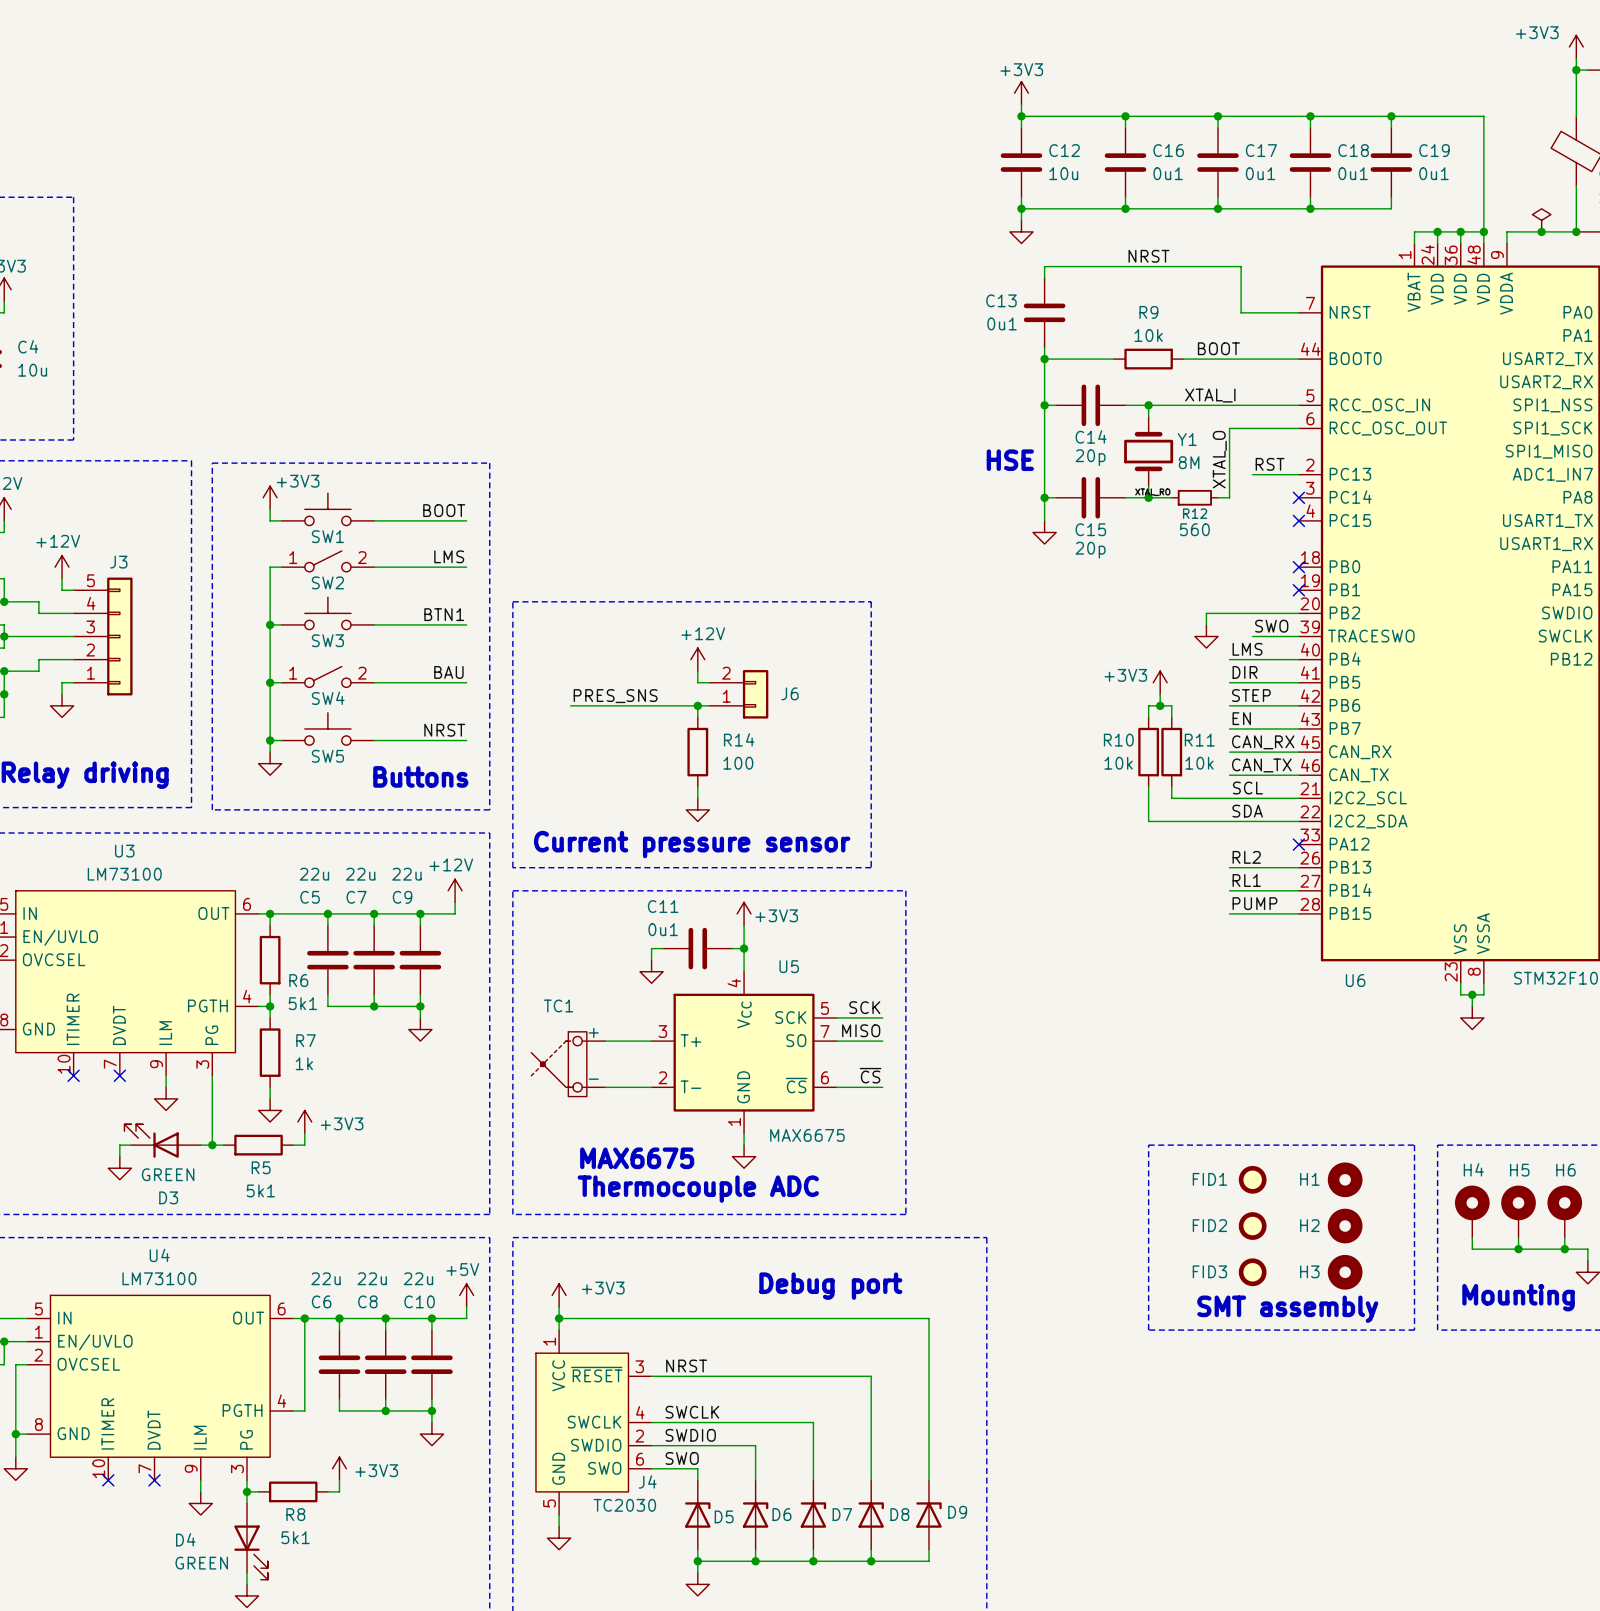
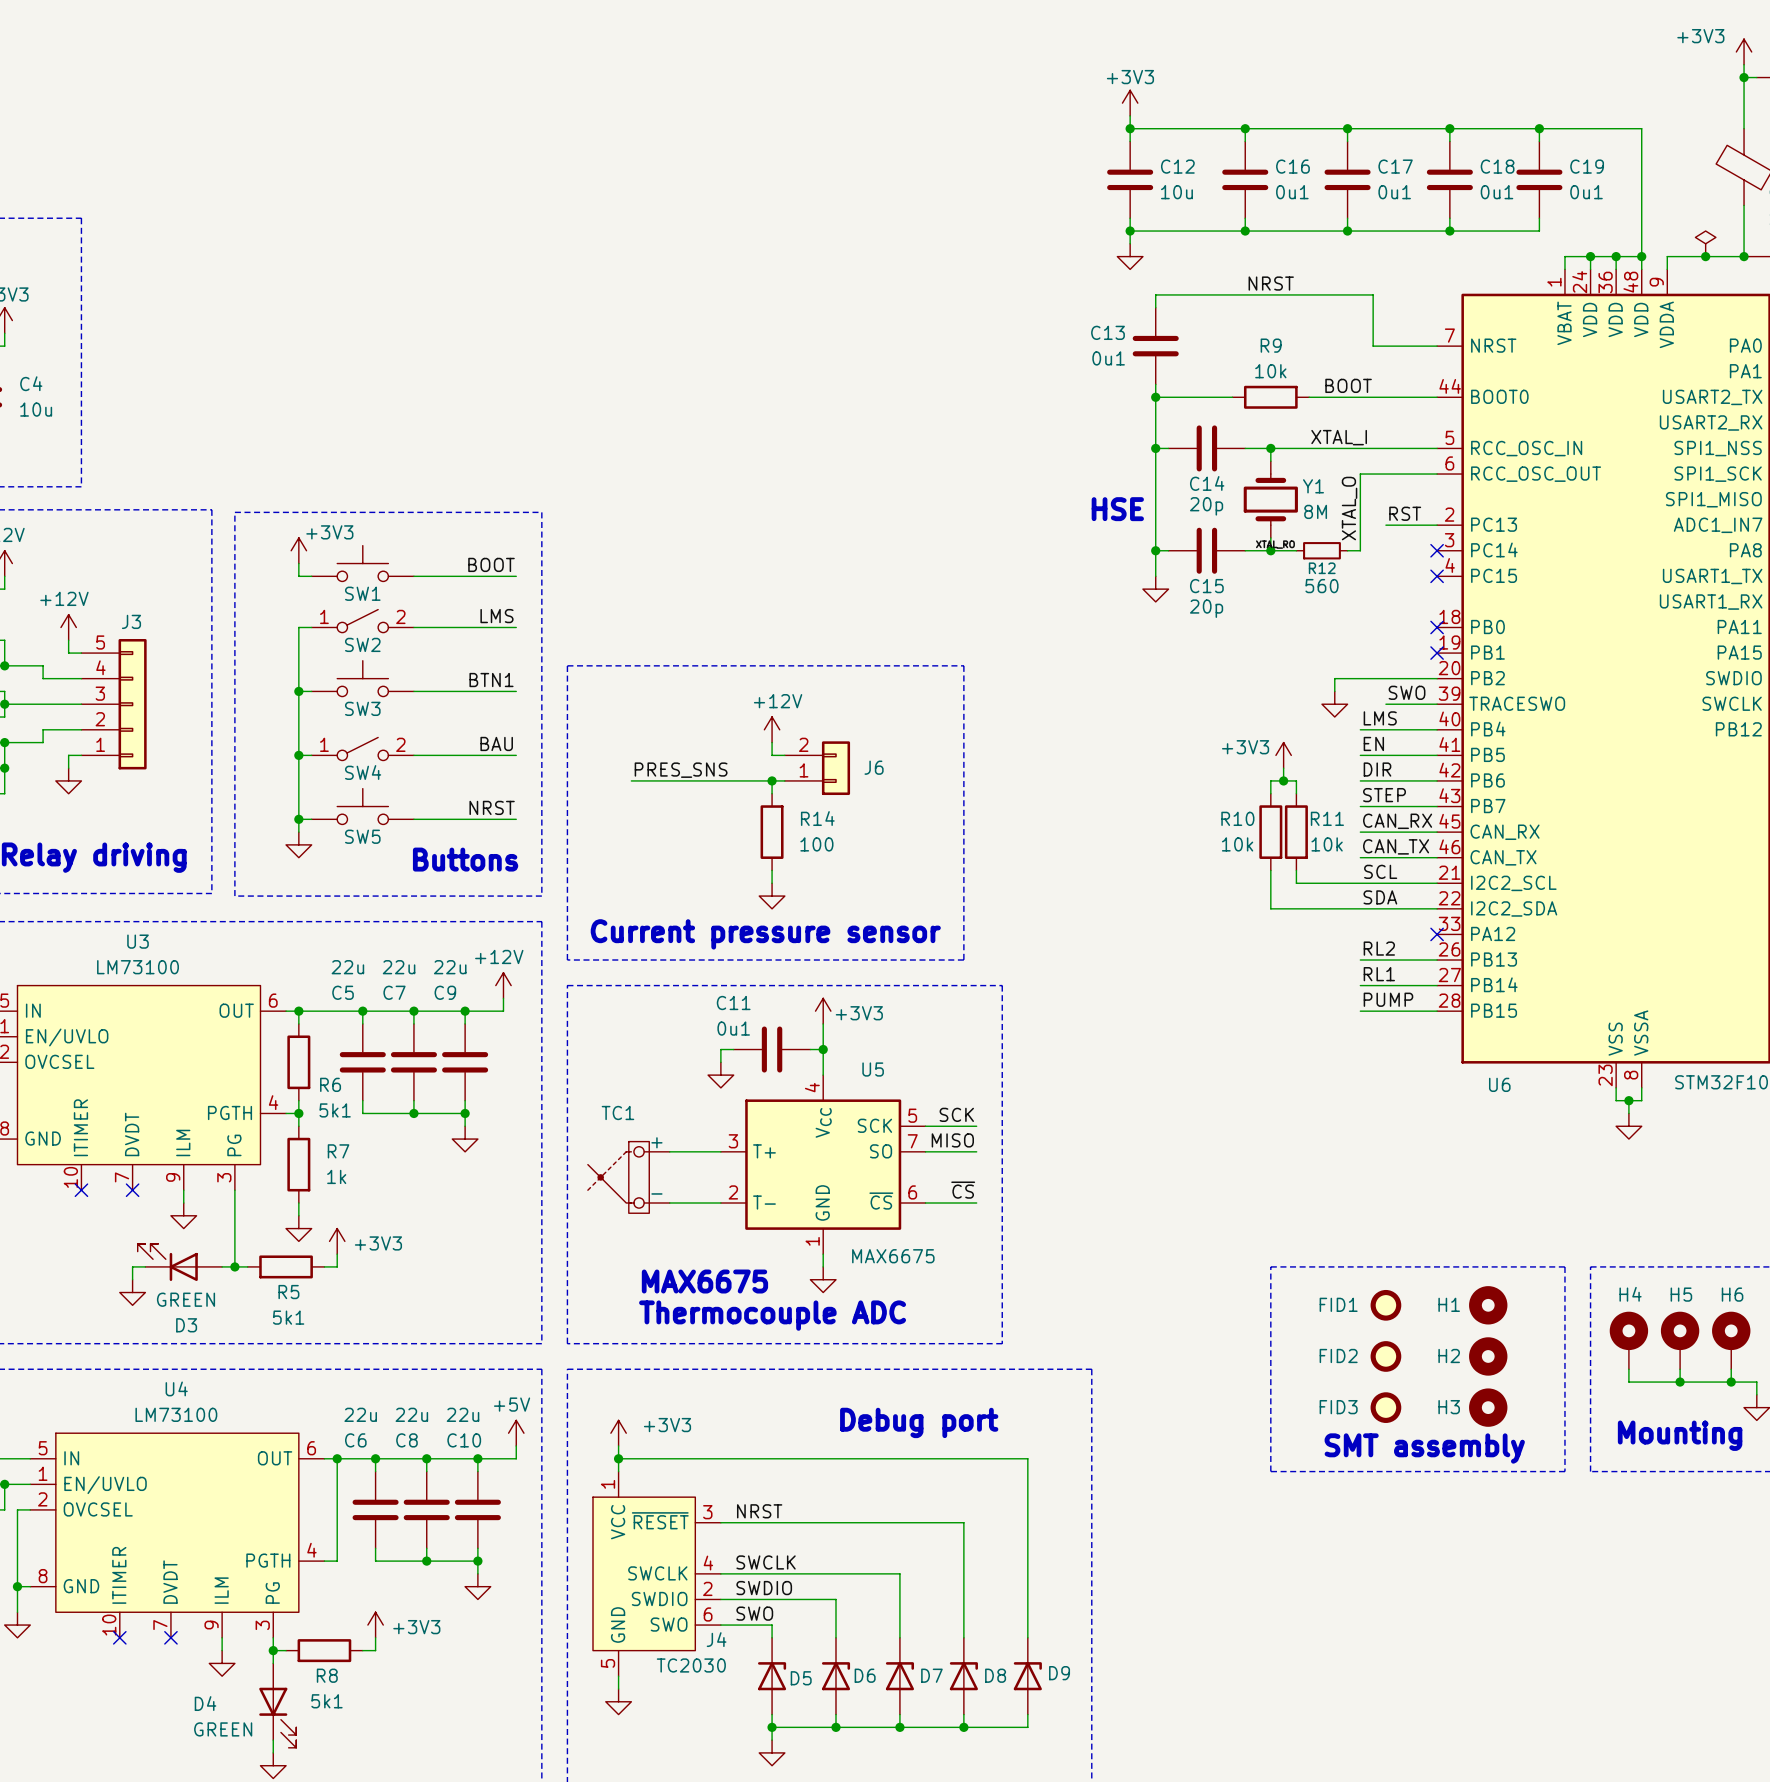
label: DIR (1245, 672) -> EN (1373, 743)
label: STEP (1251, 695) -> DIR (1377, 769)
label: EN (1241, 718) -> STEP (1384, 795)

